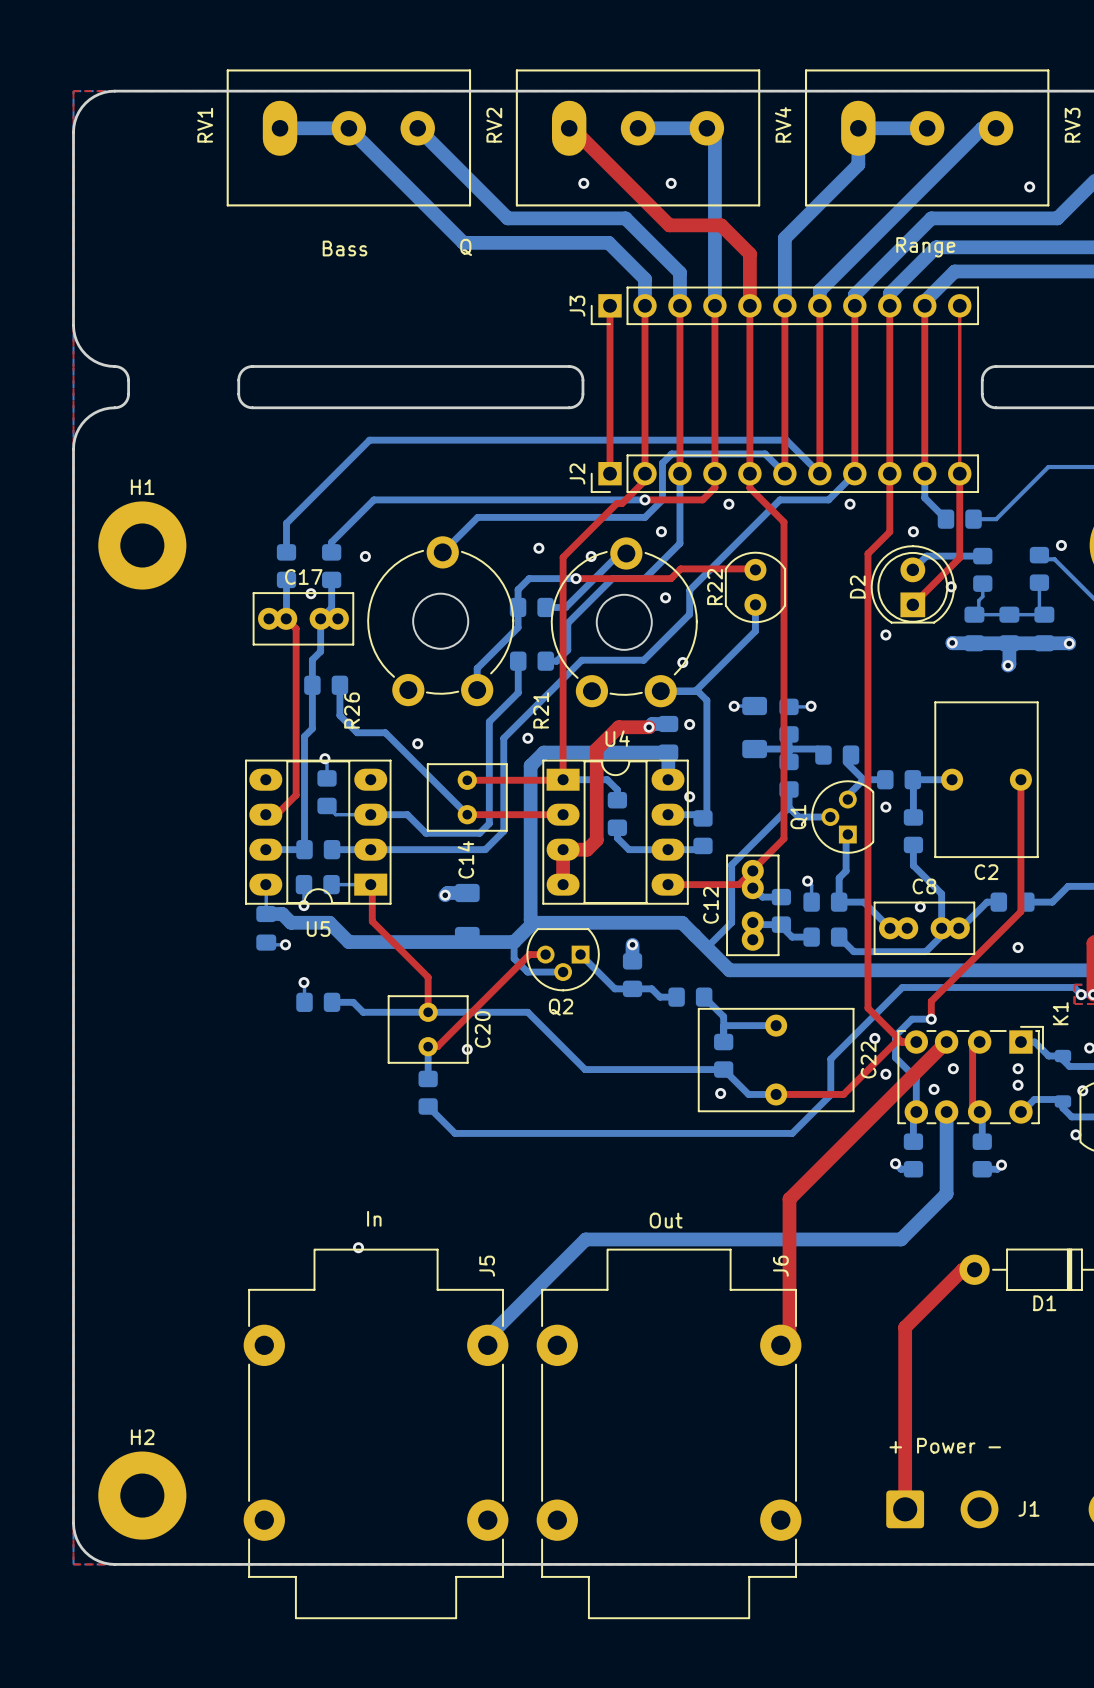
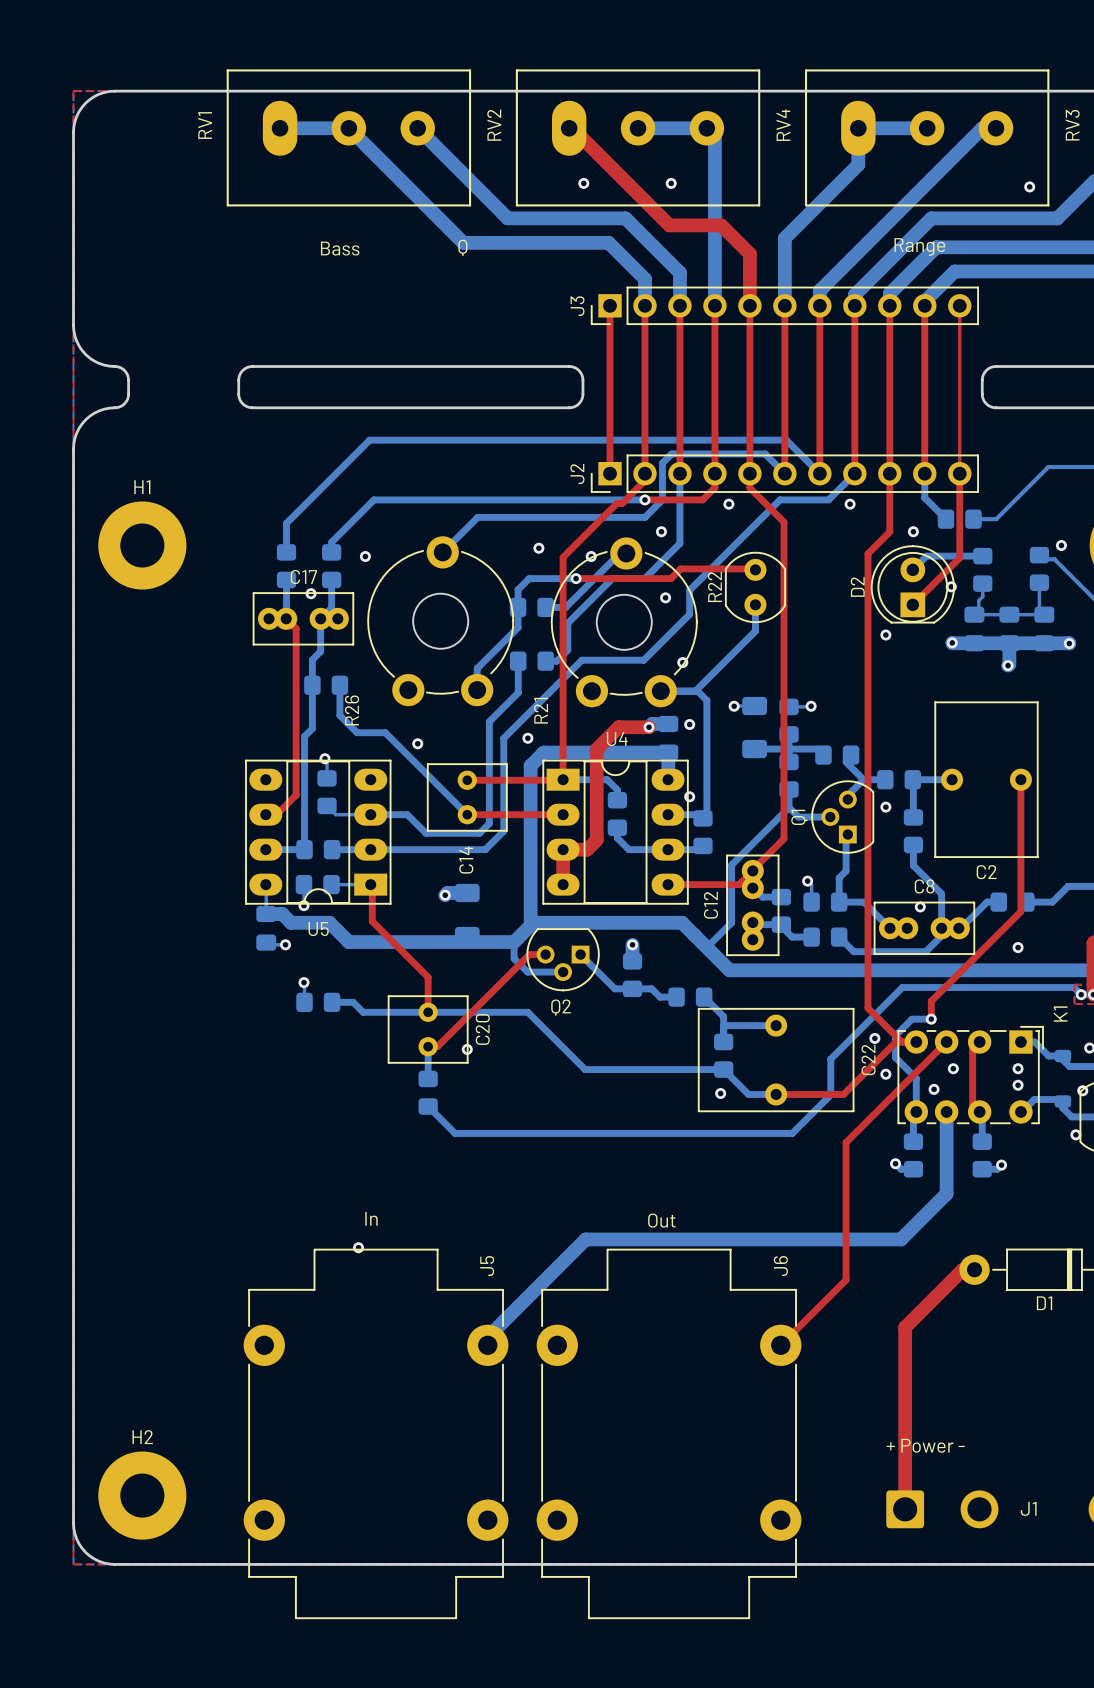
top track width: thick (946, 1042) (846, 1142) -> thin (946, 1042) (846, 1142)
top track: (846, 1142) (789, 1199) (789, 1336) -> (846, 1142) (846, 1280) (789, 1336)

